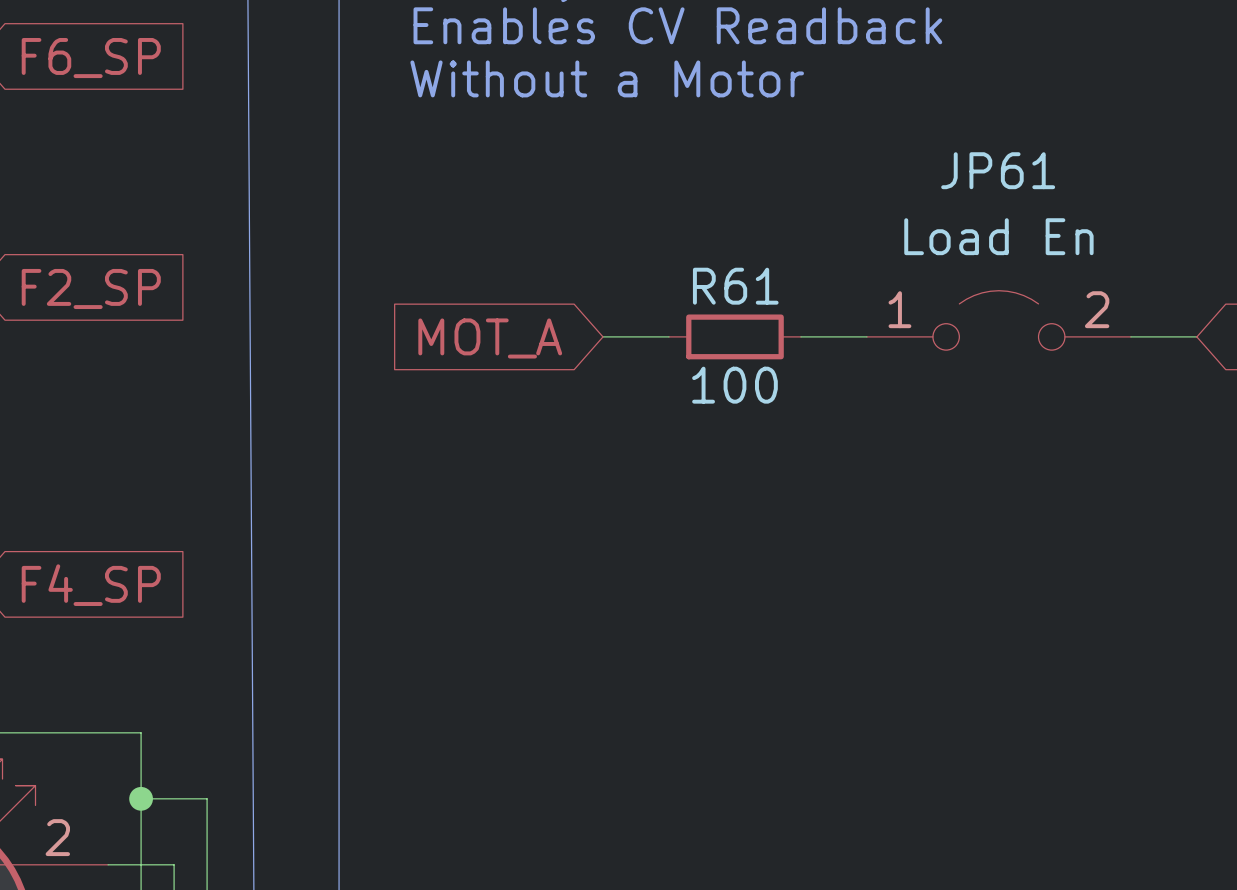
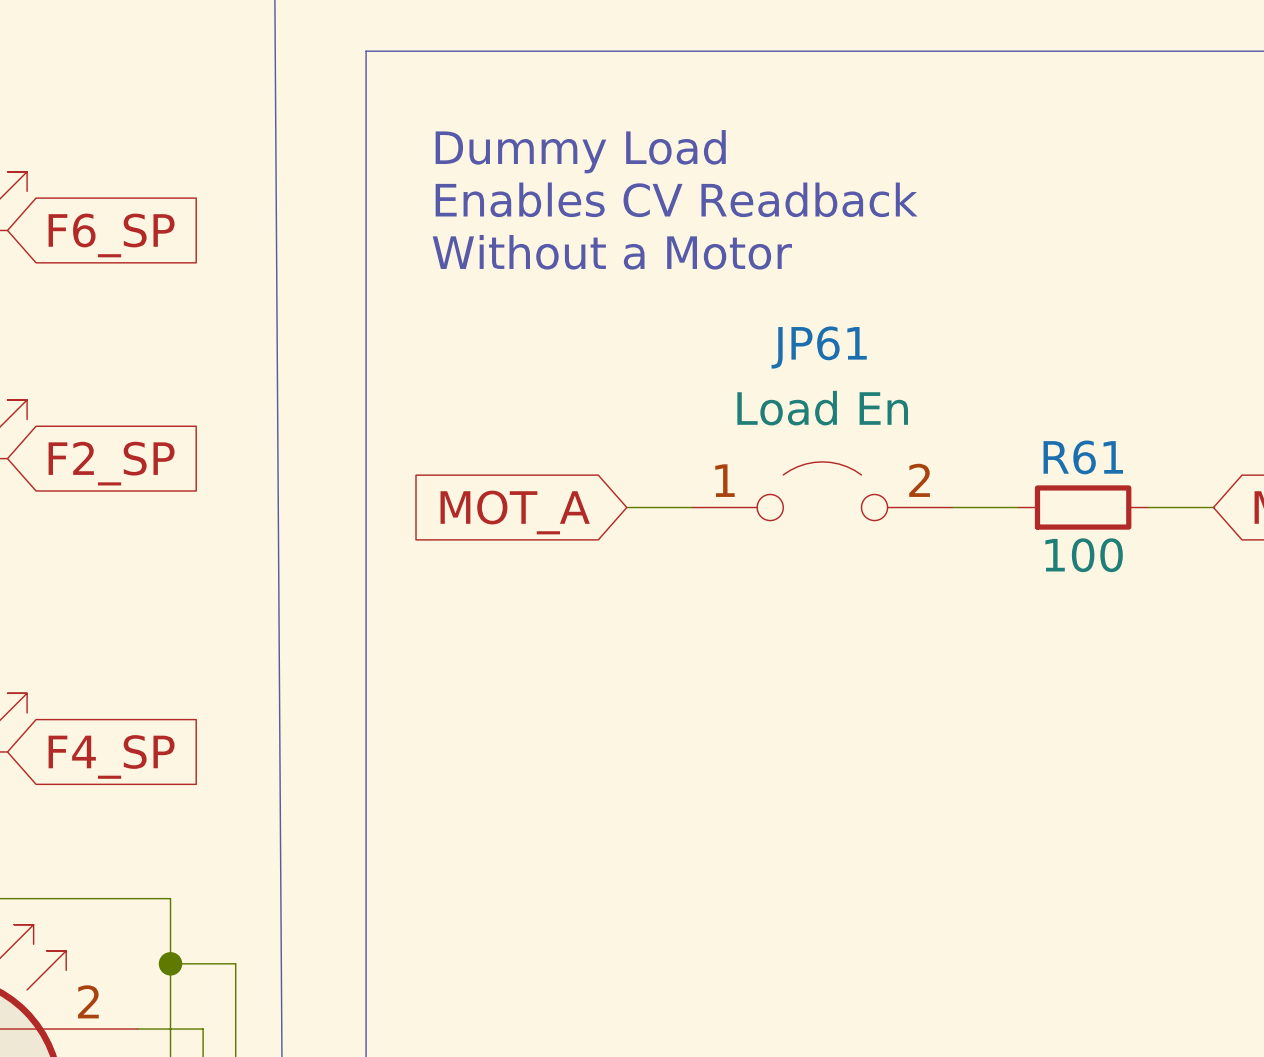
JP61 position: (998, 320) -> (822, 491)
R61 position: (734, 336) -> (1083, 507)
wire: (800, 336) (866, 336) -> (952, 507) (1017, 507)

